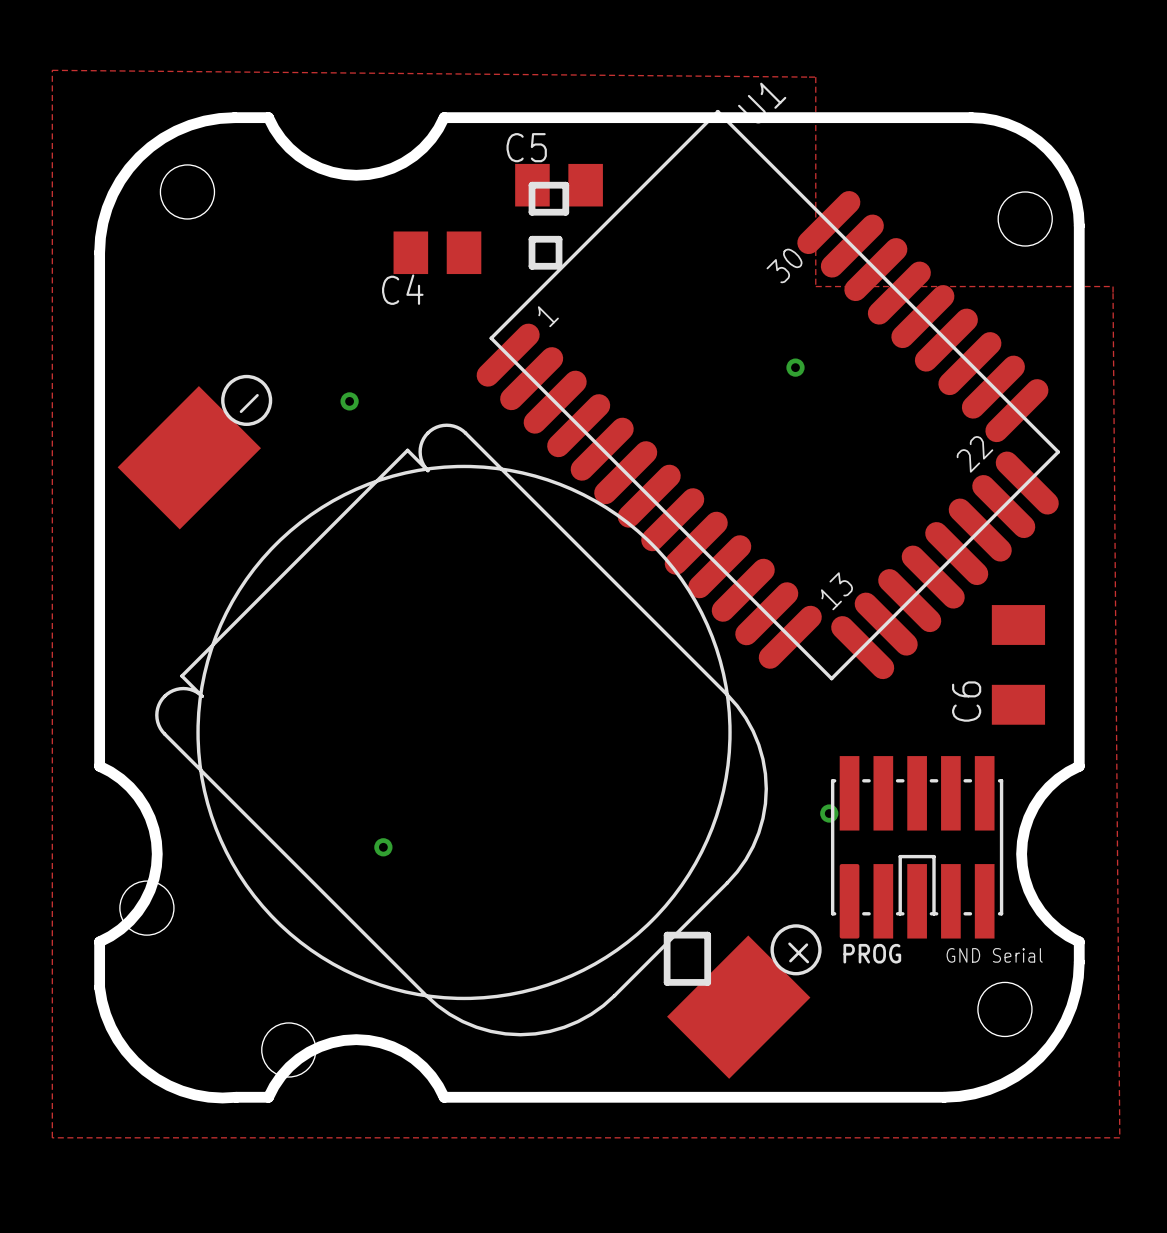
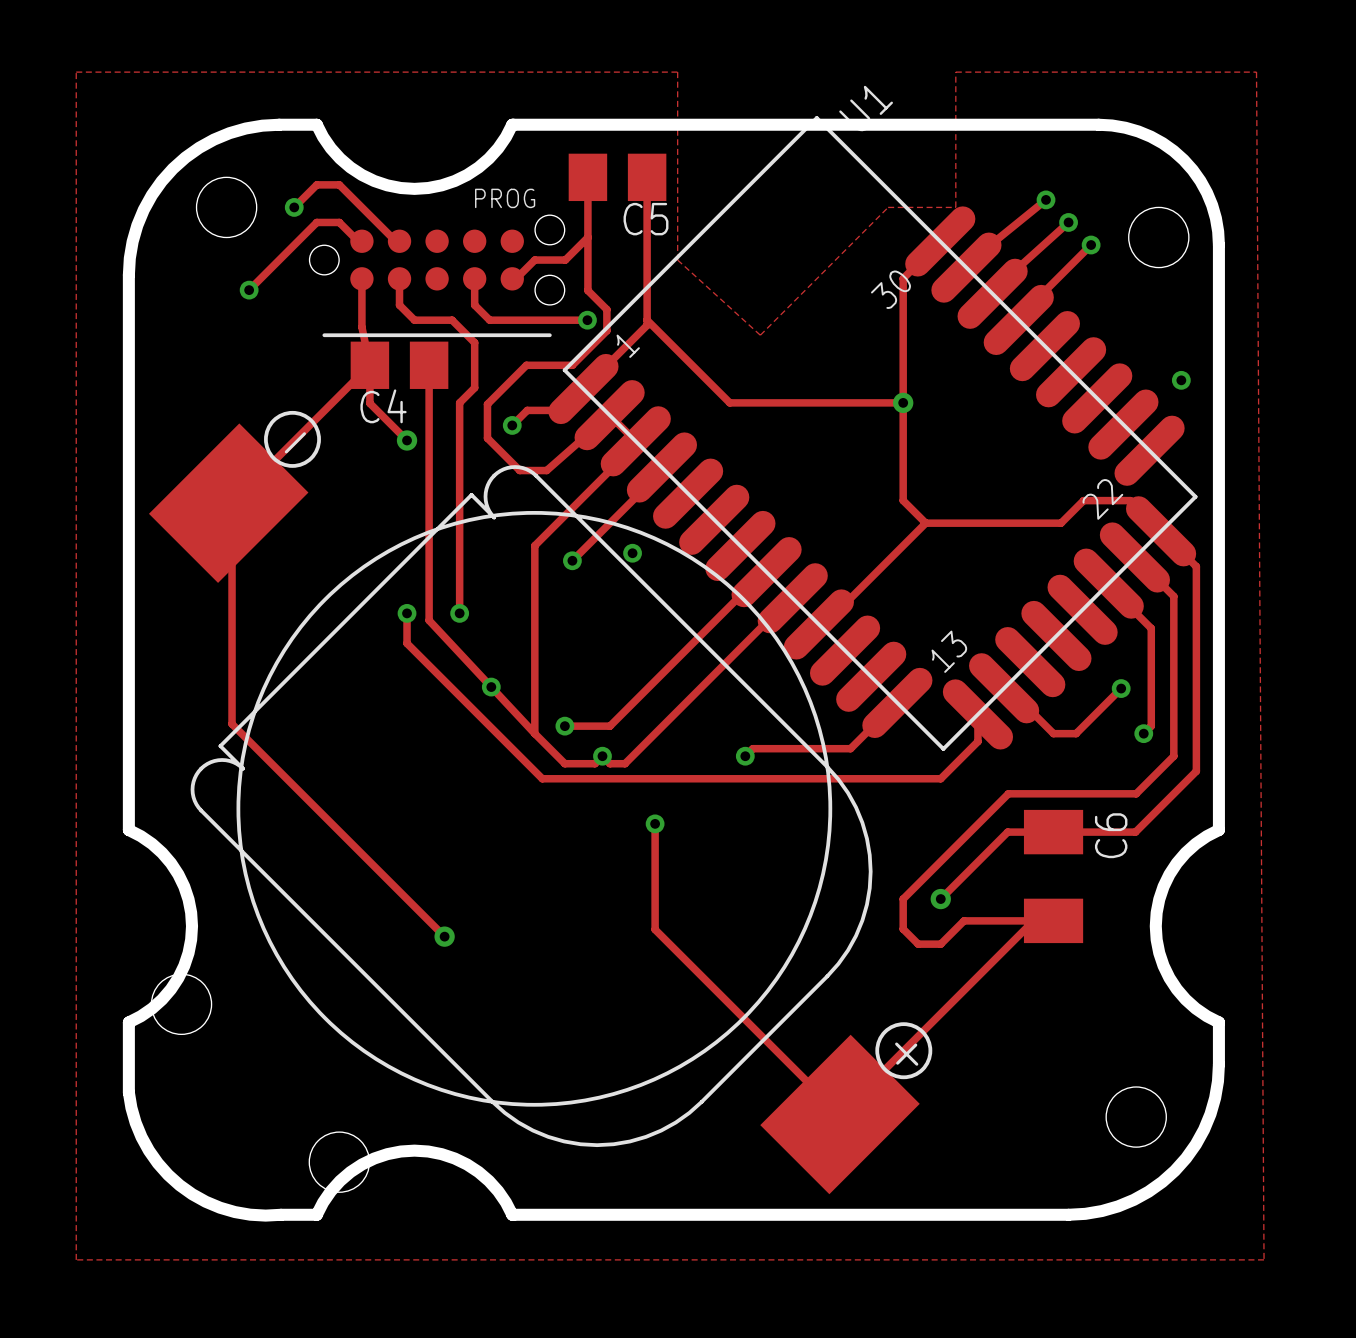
zone outline: (52, 70) (815, 77) (815, 286) (1113, 286) (1119, 1137) -> (76, 72) (677, 72) (677, 260) (760, 335) (888, 207) (955, 207) (955, 72) (1256, 72) (1264, 1259)
C5 name position: C5 (526, 147) -> C5 (645, 219)
track: none -> (587, 177) (587, 290) (606, 309) (606, 330) (572, 365) (526, 365) (487, 404) (487, 438) (519, 470) (546, 470) (609, 415) (635, 441) (635, 444) (534, 545) (534, 733)
track: none -> (647, 177) (647, 325) (562, 410) (527, 410) (512, 425)
line: (532, 185) (565, 185) (565, 212) (532, 212) (532, 185) -> none
C5 position: (559, 185) -> (617, 177)
track: none -> (1046, 199) (966, 264) (966, 267)
via: none -> (1046, 199)
track: none -> (294, 207) (316, 184) (339, 184) (395, 241) (399, 241)
via: none -> (294, 207)
track: none -> (1068, 222) (992, 290) (992, 293)
via: none -> (1068, 222)
track: none -> (587, 237) (565, 260) (534, 260) (516, 278) (512, 278)
track: none -> (361, 241) (358, 241) (339, 222) (316, 222) (249, 290)
track: none -> (940, 241) (903, 278) (903, 500) (925, 523)
track: none -> (1091, 245) (1018, 317) (1018, 319)
via: none -> (1091, 245)
line: (532, 239) (532, 266) (559, 266) (559, 239) (532, 239) -> none
C4 position: (437, 252) -> (399, 365)
PROG: none -> (437, 276)
track: none -> (361, 278) (361, 327) (369, 365)
track: none -> (399, 278) (399, 305) (414, 320) (452, 320) (474, 342) (474, 387) (459, 402) (459, 613)
track: none -> (474, 278) (474, 305) (489, 320) (587, 320)
via: none -> (249, 290)
C4 name position: C4 (402, 289) -> C4 (383, 406)
via: none -> (587, 320)
track: none -> (647, 320) (729, 402) (903, 402)
track: none -> (369, 365) (232, 503)
track: none -> (369, 365) (369, 403) (407, 440)
track: none -> (429, 365) (429, 620) (534, 733)
via: none -> (1181, 380)
via: none -> (512, 425)
track: none -> (661, 467) (661, 471) (572, 560)
track: none -> (232, 503) (232, 724) (444, 936)
track: none -> (925, 523) (824, 624) (818, 624)
track: none -> (925, 523) (1061, 523) (1083, 500) (1130, 500) (1196, 566) (1196, 771) (1135, 832) (1007, 832) (940, 899)
via: none -> (632, 553)
track: none -> (1134, 557) (1173, 596) (1173, 756) (1136, 793) (1008, 793) (903, 899) (903, 929) (918, 944) (940, 944) (964, 920) (1053, 920)
via: none -> (572, 560)
track: none -> (766, 572) (764, 572) (610, 726) (564, 726)
track: none -> (1108, 583) (1108, 585) (1151, 628) (1151, 726) (1143, 733)
track: none -> (792, 598) (790, 598) (625, 763) (610, 763) (602, 756) (594, 763) (564, 763) (534, 733)
track: none -> (407, 613) (407, 643) (542, 778) (940, 778) (977, 741) (977, 714)
via: none -> (407, 613)
via: none -> (459, 613)
via: none -> (491, 687)
track: none -> (1004, 688) (1008, 688) (1053, 733) (1076, 733) (1121, 688)
via: none -> (1121, 688)
track: none -> (897, 702) (850, 748) (752, 748) (745, 756)
via: none -> (564, 726)
via: none -> (1143, 733)
C6 position: (1018, 664) -> (1053, 876)
via: none -> (602, 756)
via: none -> (745, 756)
C6 name position: C6 (966, 701) -> C6 (1111, 835)
track: none -> (655, 823) (655, 929) (840, 1114) (1033, 920)
via: none -> (655, 823)
board edge: (99, 751) (99, 766) (120, 778) (138, 796) (144, 806) (154, 829) (157, 854) (154, 878) (144, 901) (138, 911) (120, 929) (99, 941) -> (128, 830) (152, 843) (162, 852) (178, 874) (188, 899) (192, 926) (188, 952) (178, 977) (162, 999) (152, 1008) (128, 1022) (128, 1041)
board edge: (1079, 751) (1079, 766) (1058, 778) (1040, 796) (1034, 806) (1024, 829) (1021, 854) (1024, 878) (1034, 901) (1040, 911) (1058, 929) (1079, 941) -> (1218, 830) (1195, 843) (1185, 852) (1169, 874) (1159, 899) (1155, 926) (1159, 952) (1169, 977) (1185, 999) (1195, 1008) (1218, 1022) (1218, 1041)
PROG: (917, 847) -> none
line: (667, 935) (707, 935) (707, 982) (667, 982) (667, 935) -> none
text: GND Serial (994, 955) -> none

